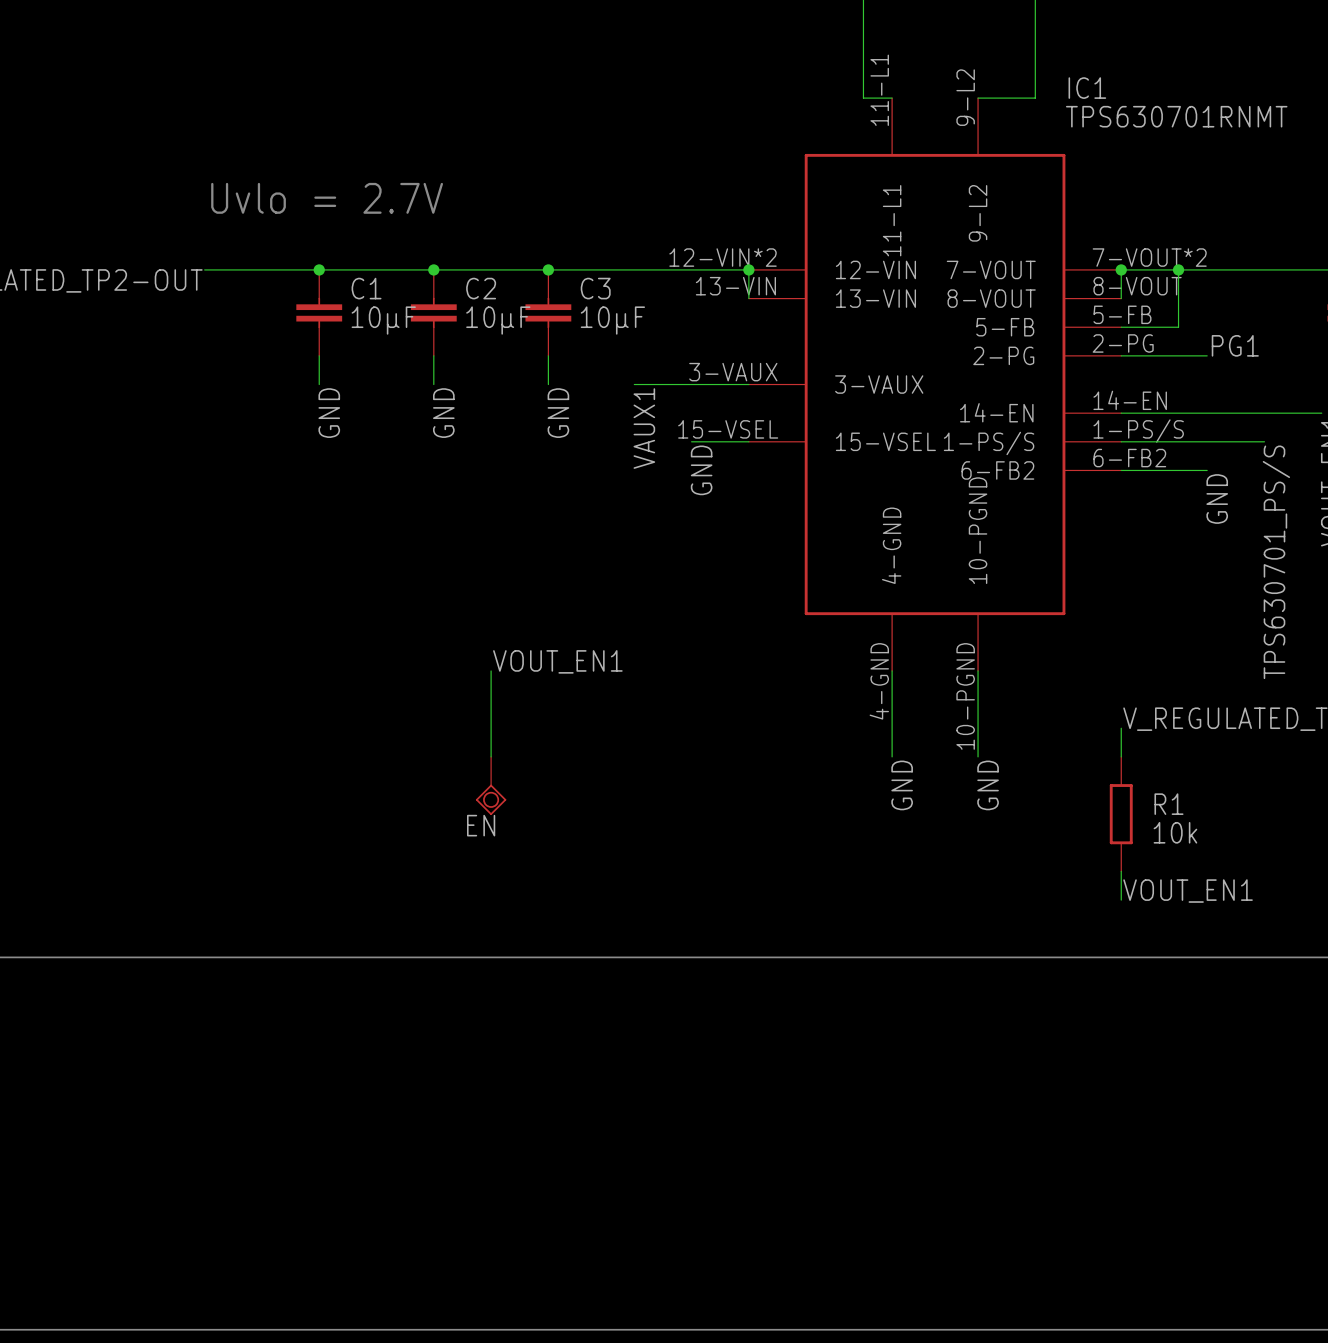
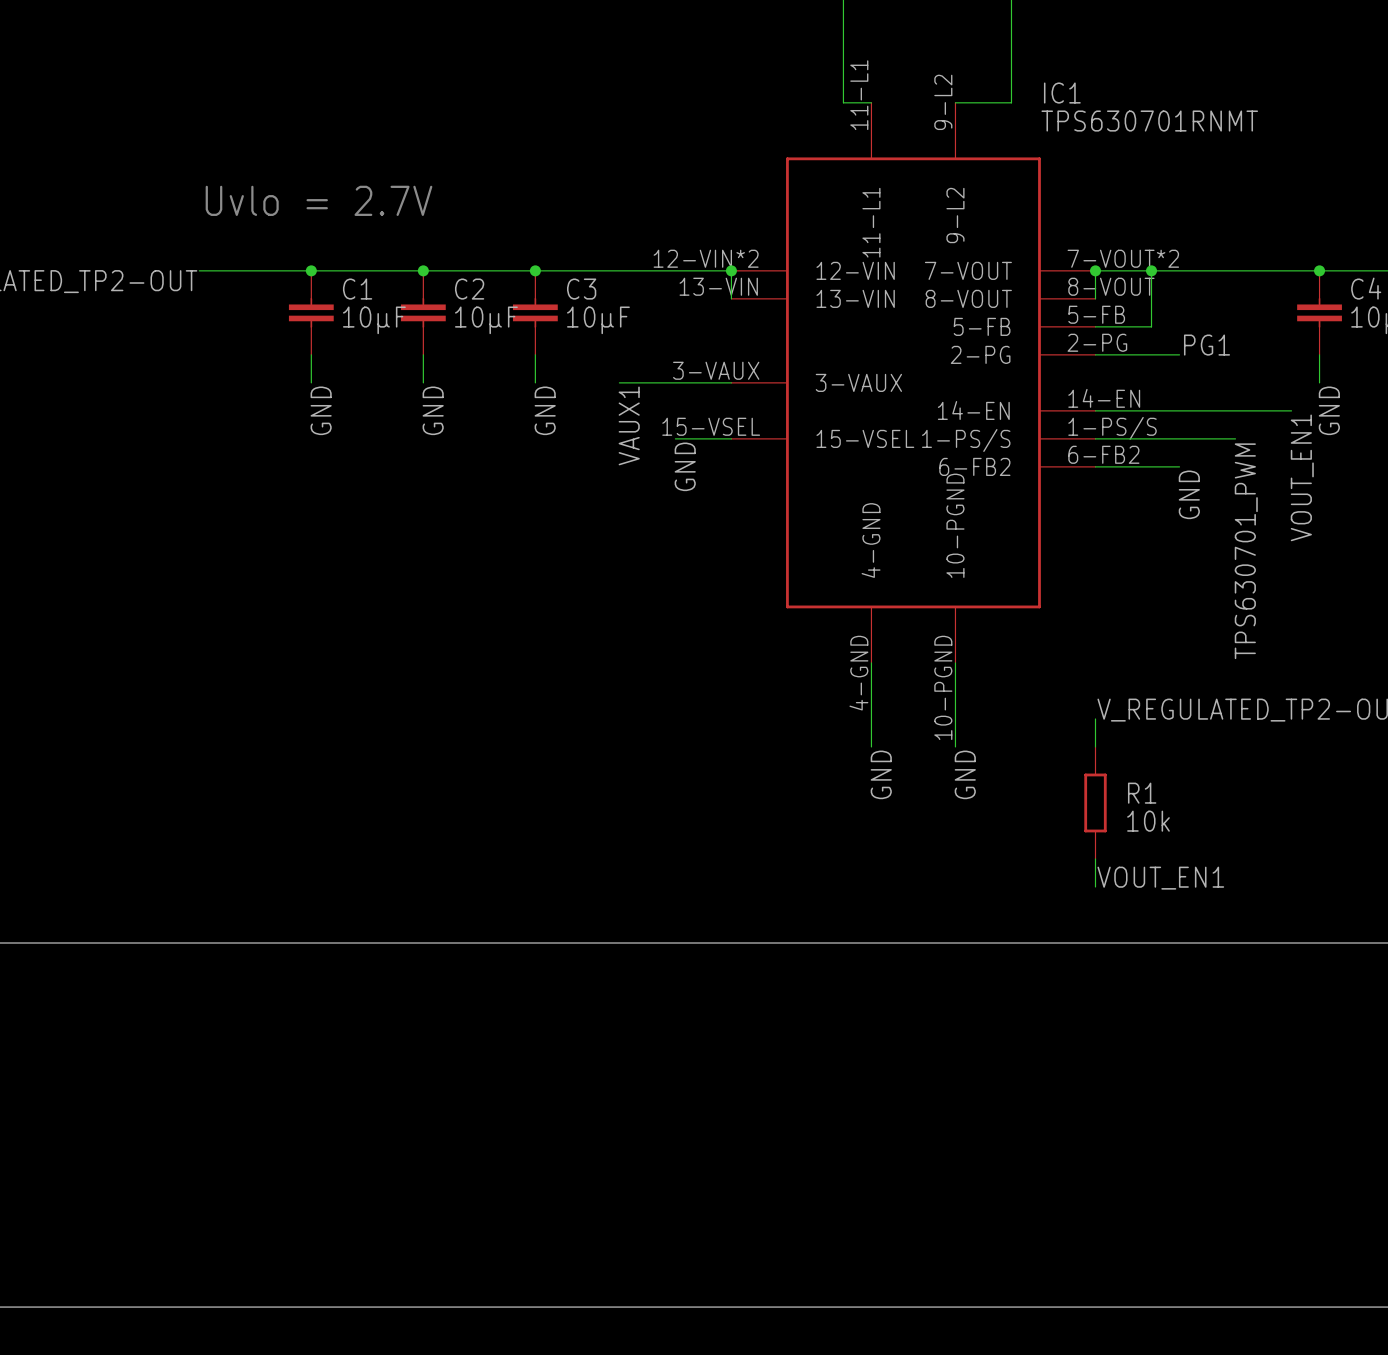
label: TPS630701_PS/S (1276, 562) -> TPS630701_PWM (1246, 551)
label: VOUT_EN1 (557, 661) -> none
wire: (491, 670) (491, 756) -> none
EN: (491, 785) -> none

